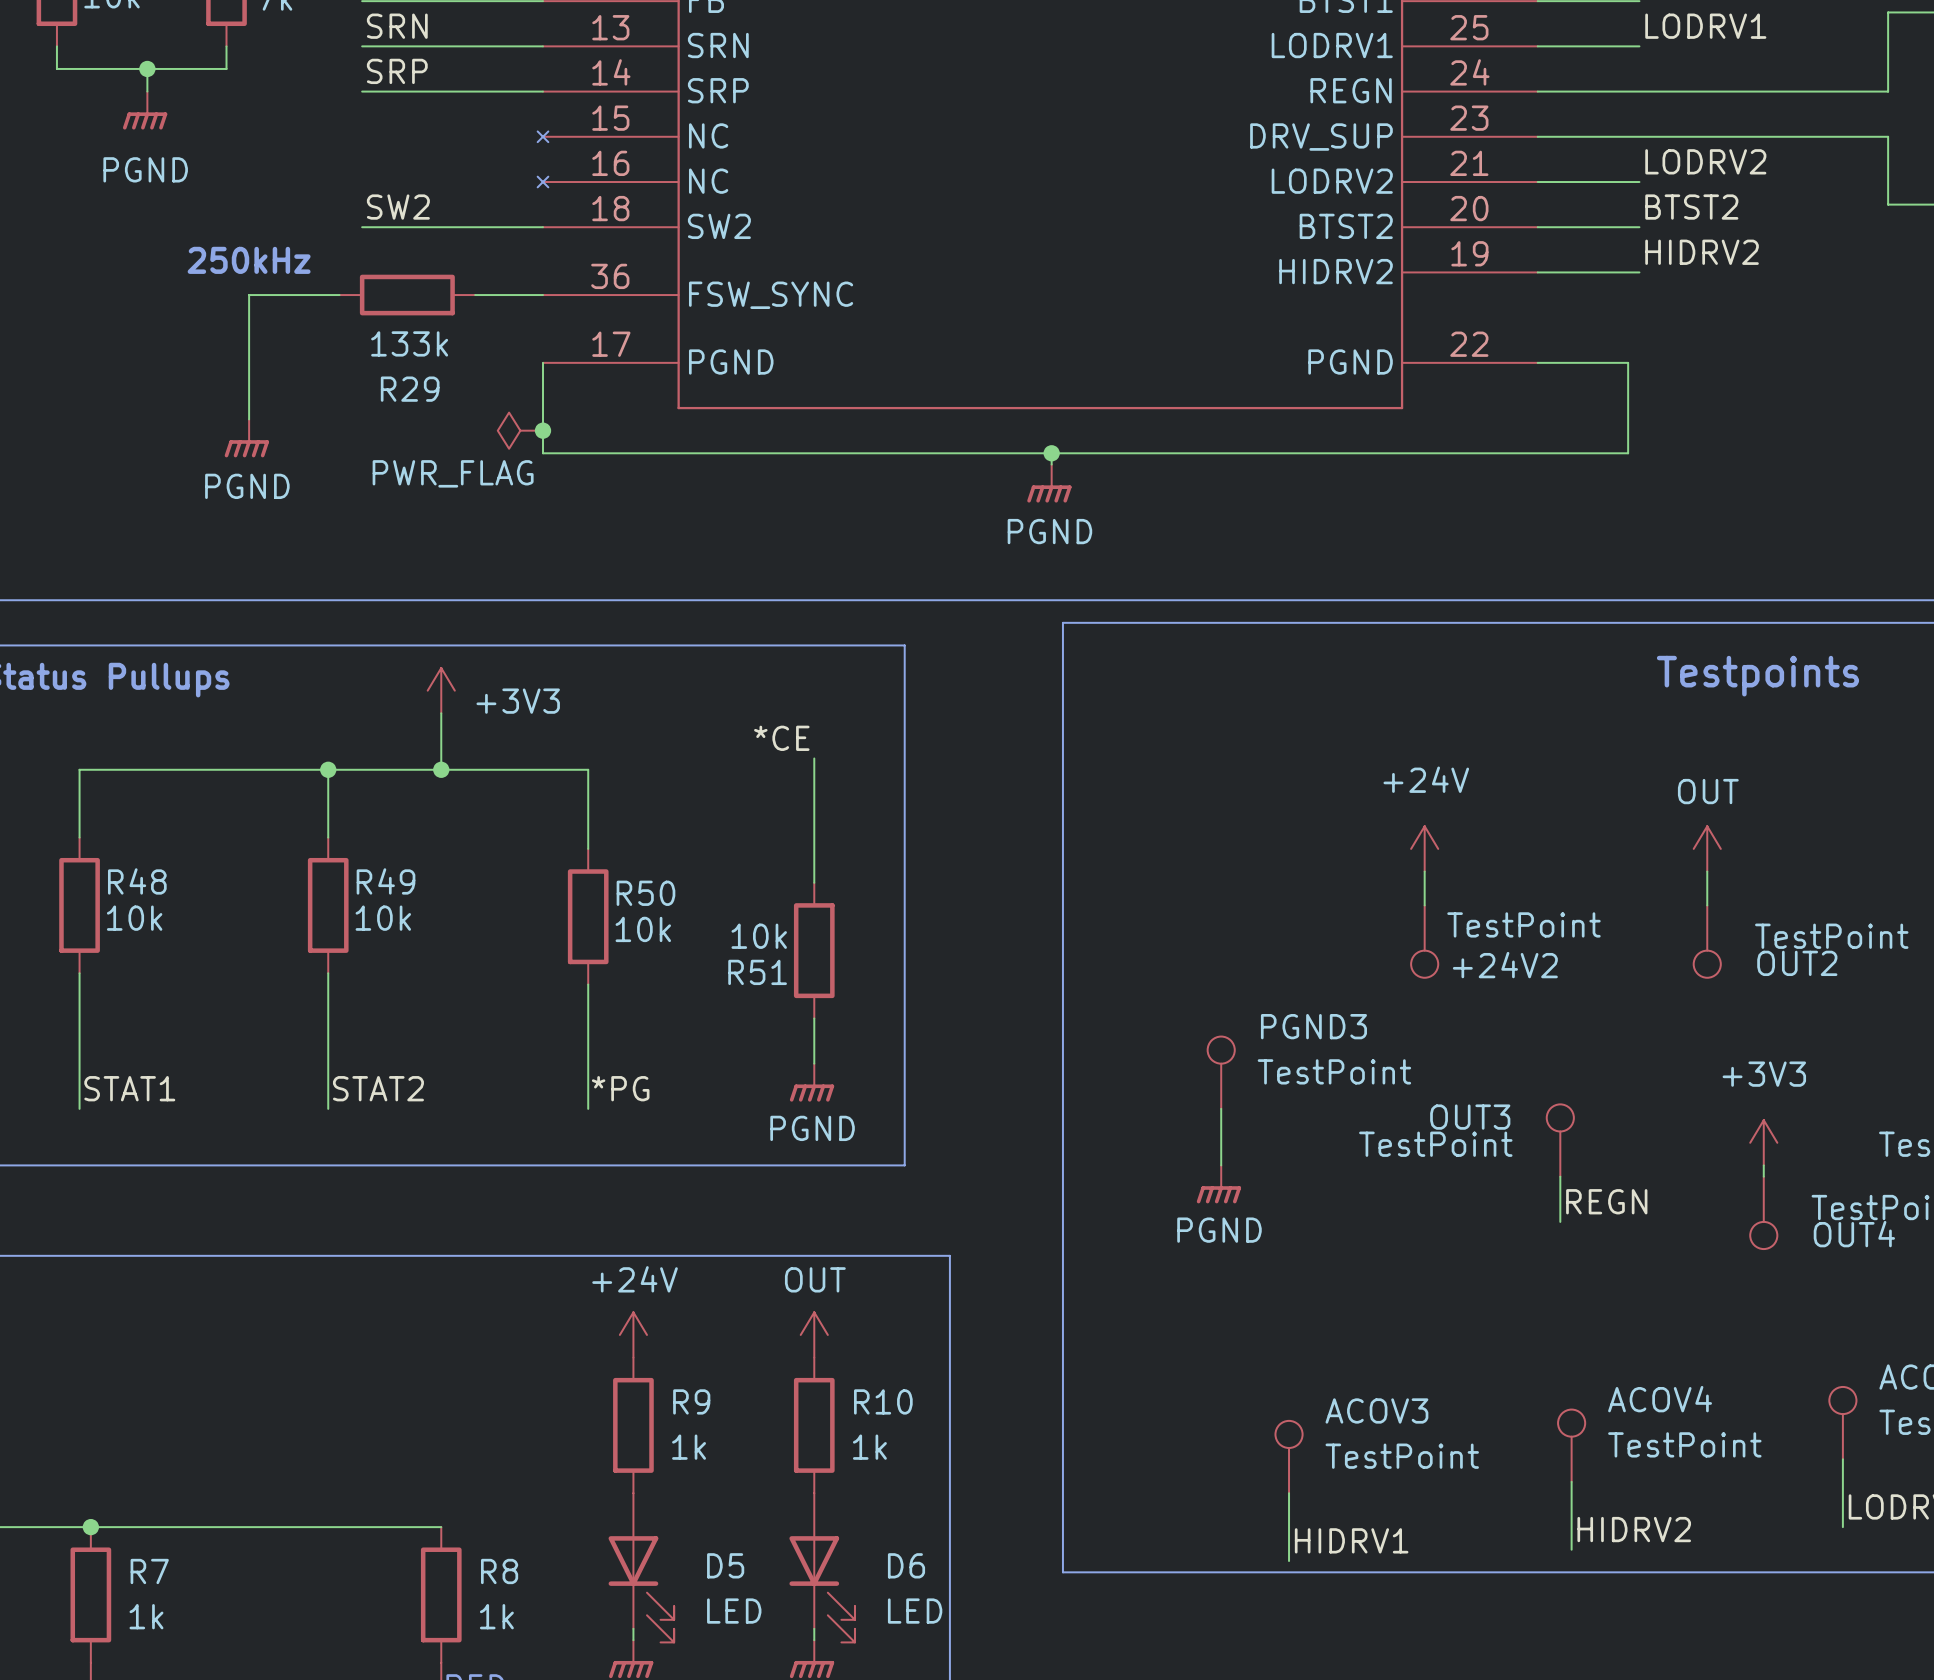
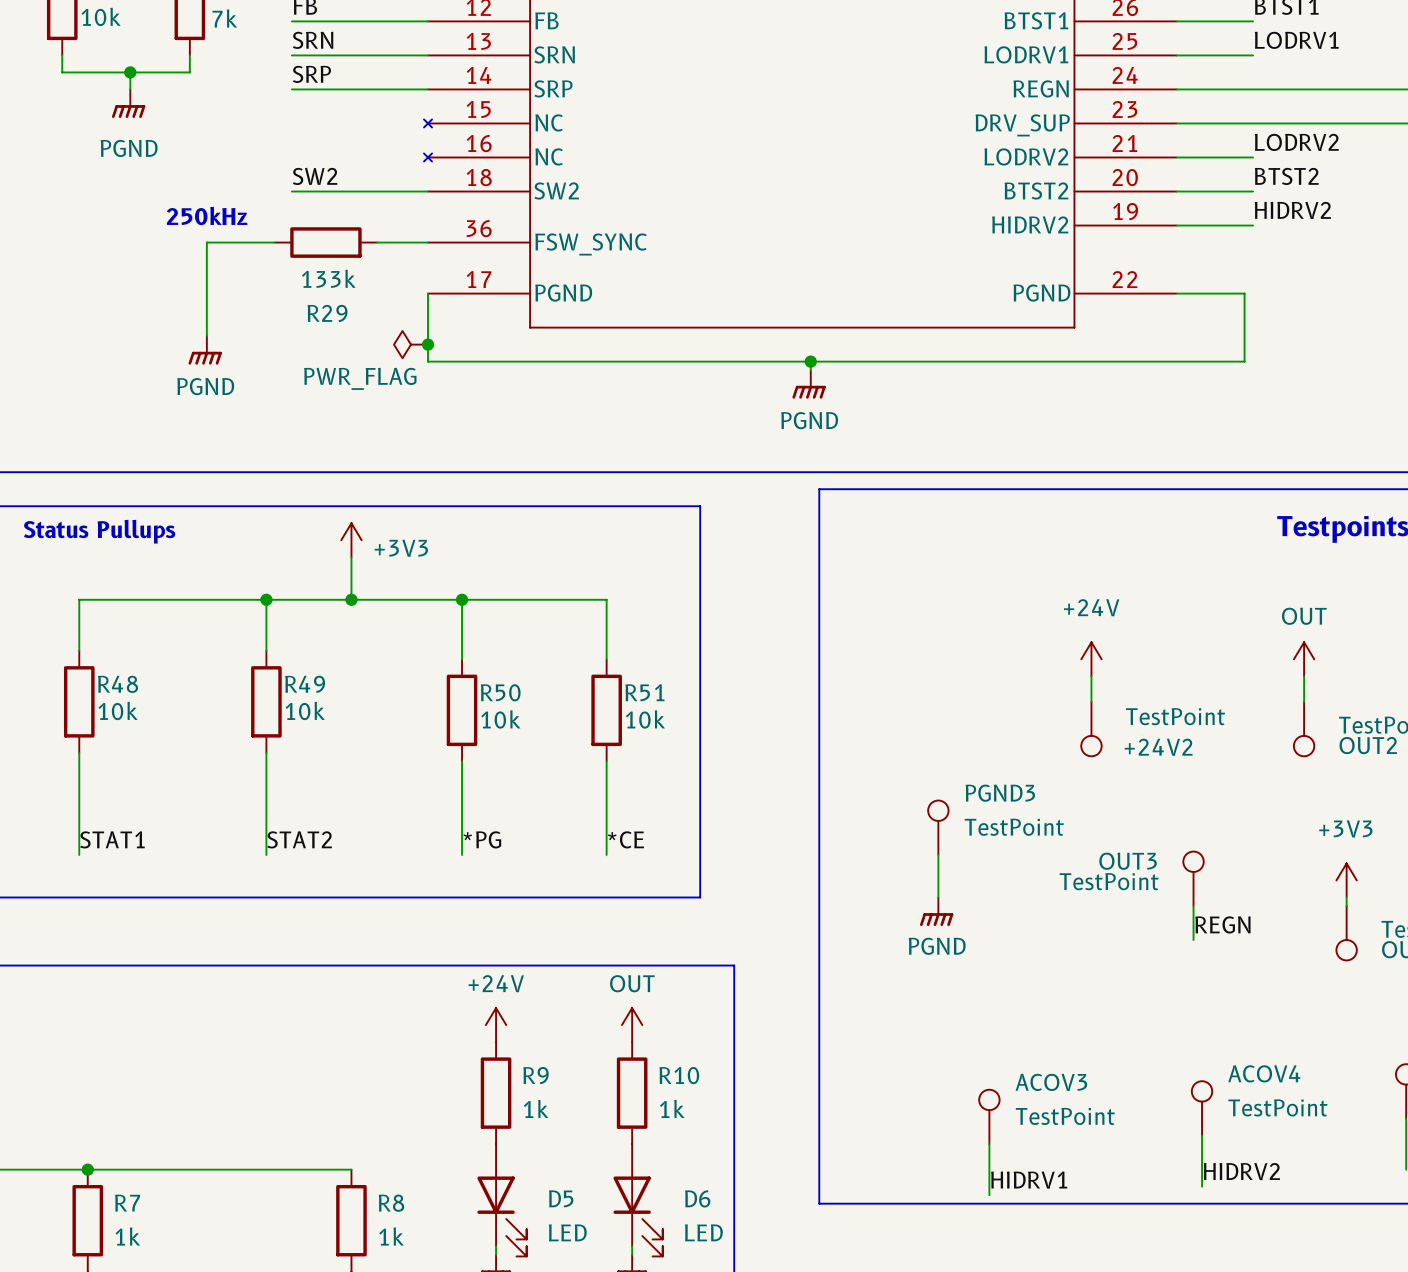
label position: *CE (781, 738) -> *CE (626, 839)
wire: (814, 758) (814, 882) -> (606, 761) (606, 854)
wire: none -> (462, 599) (606, 599) (606, 659)
junction: none -> (462, 599)
R51 value position: 10k (759, 936) -> 10k (645, 719)
R51 position: (814, 950) -> (606, 710)
R51 name position: R51 (757, 972) -> R51 (644, 692)
wire: (814, 1018) (814, 1063) -> none
power symbol: PGND (812, 1082) -> none

